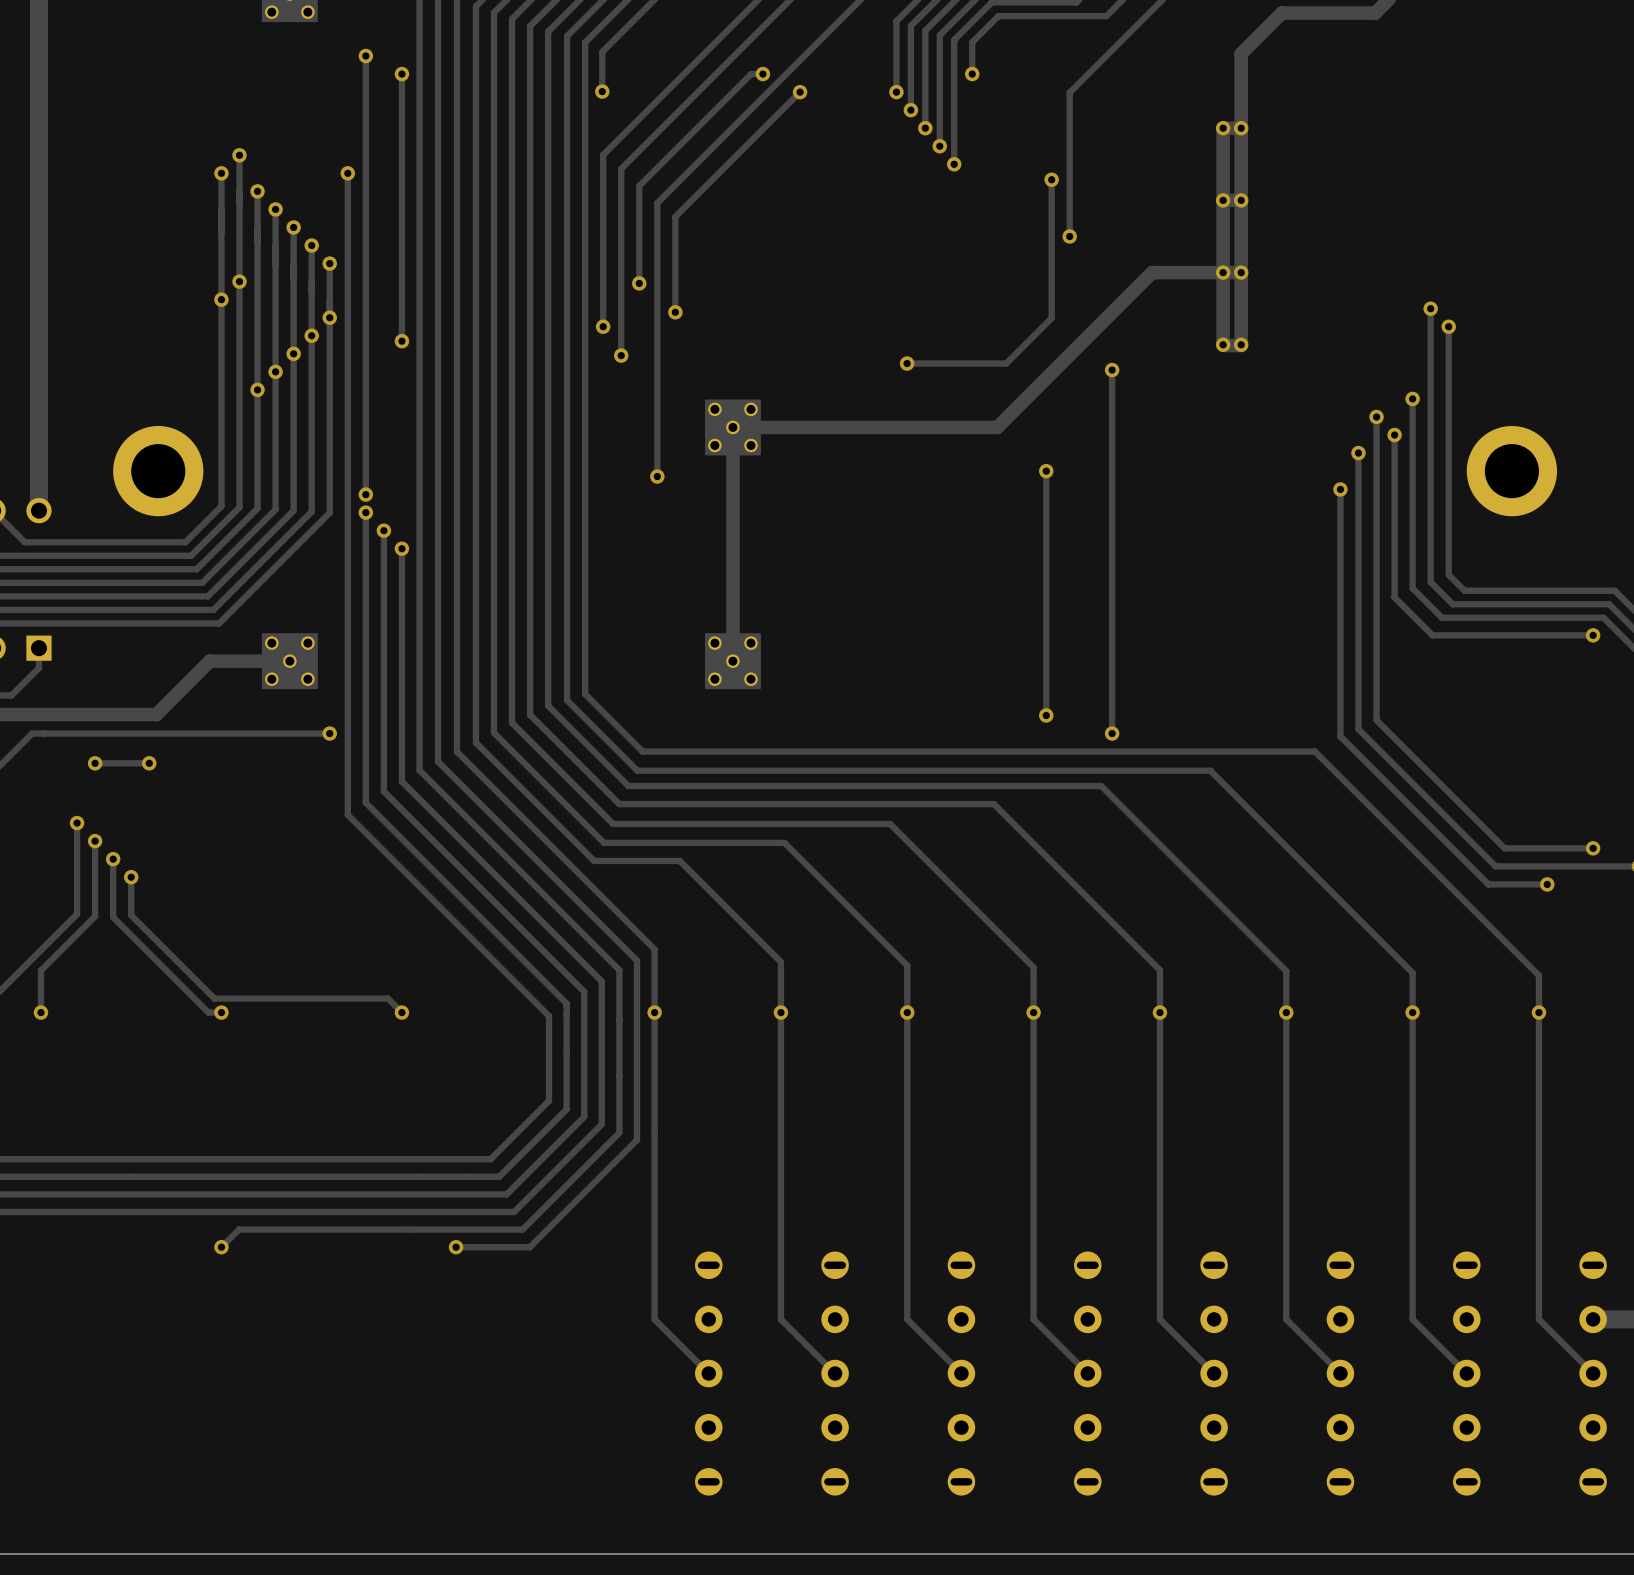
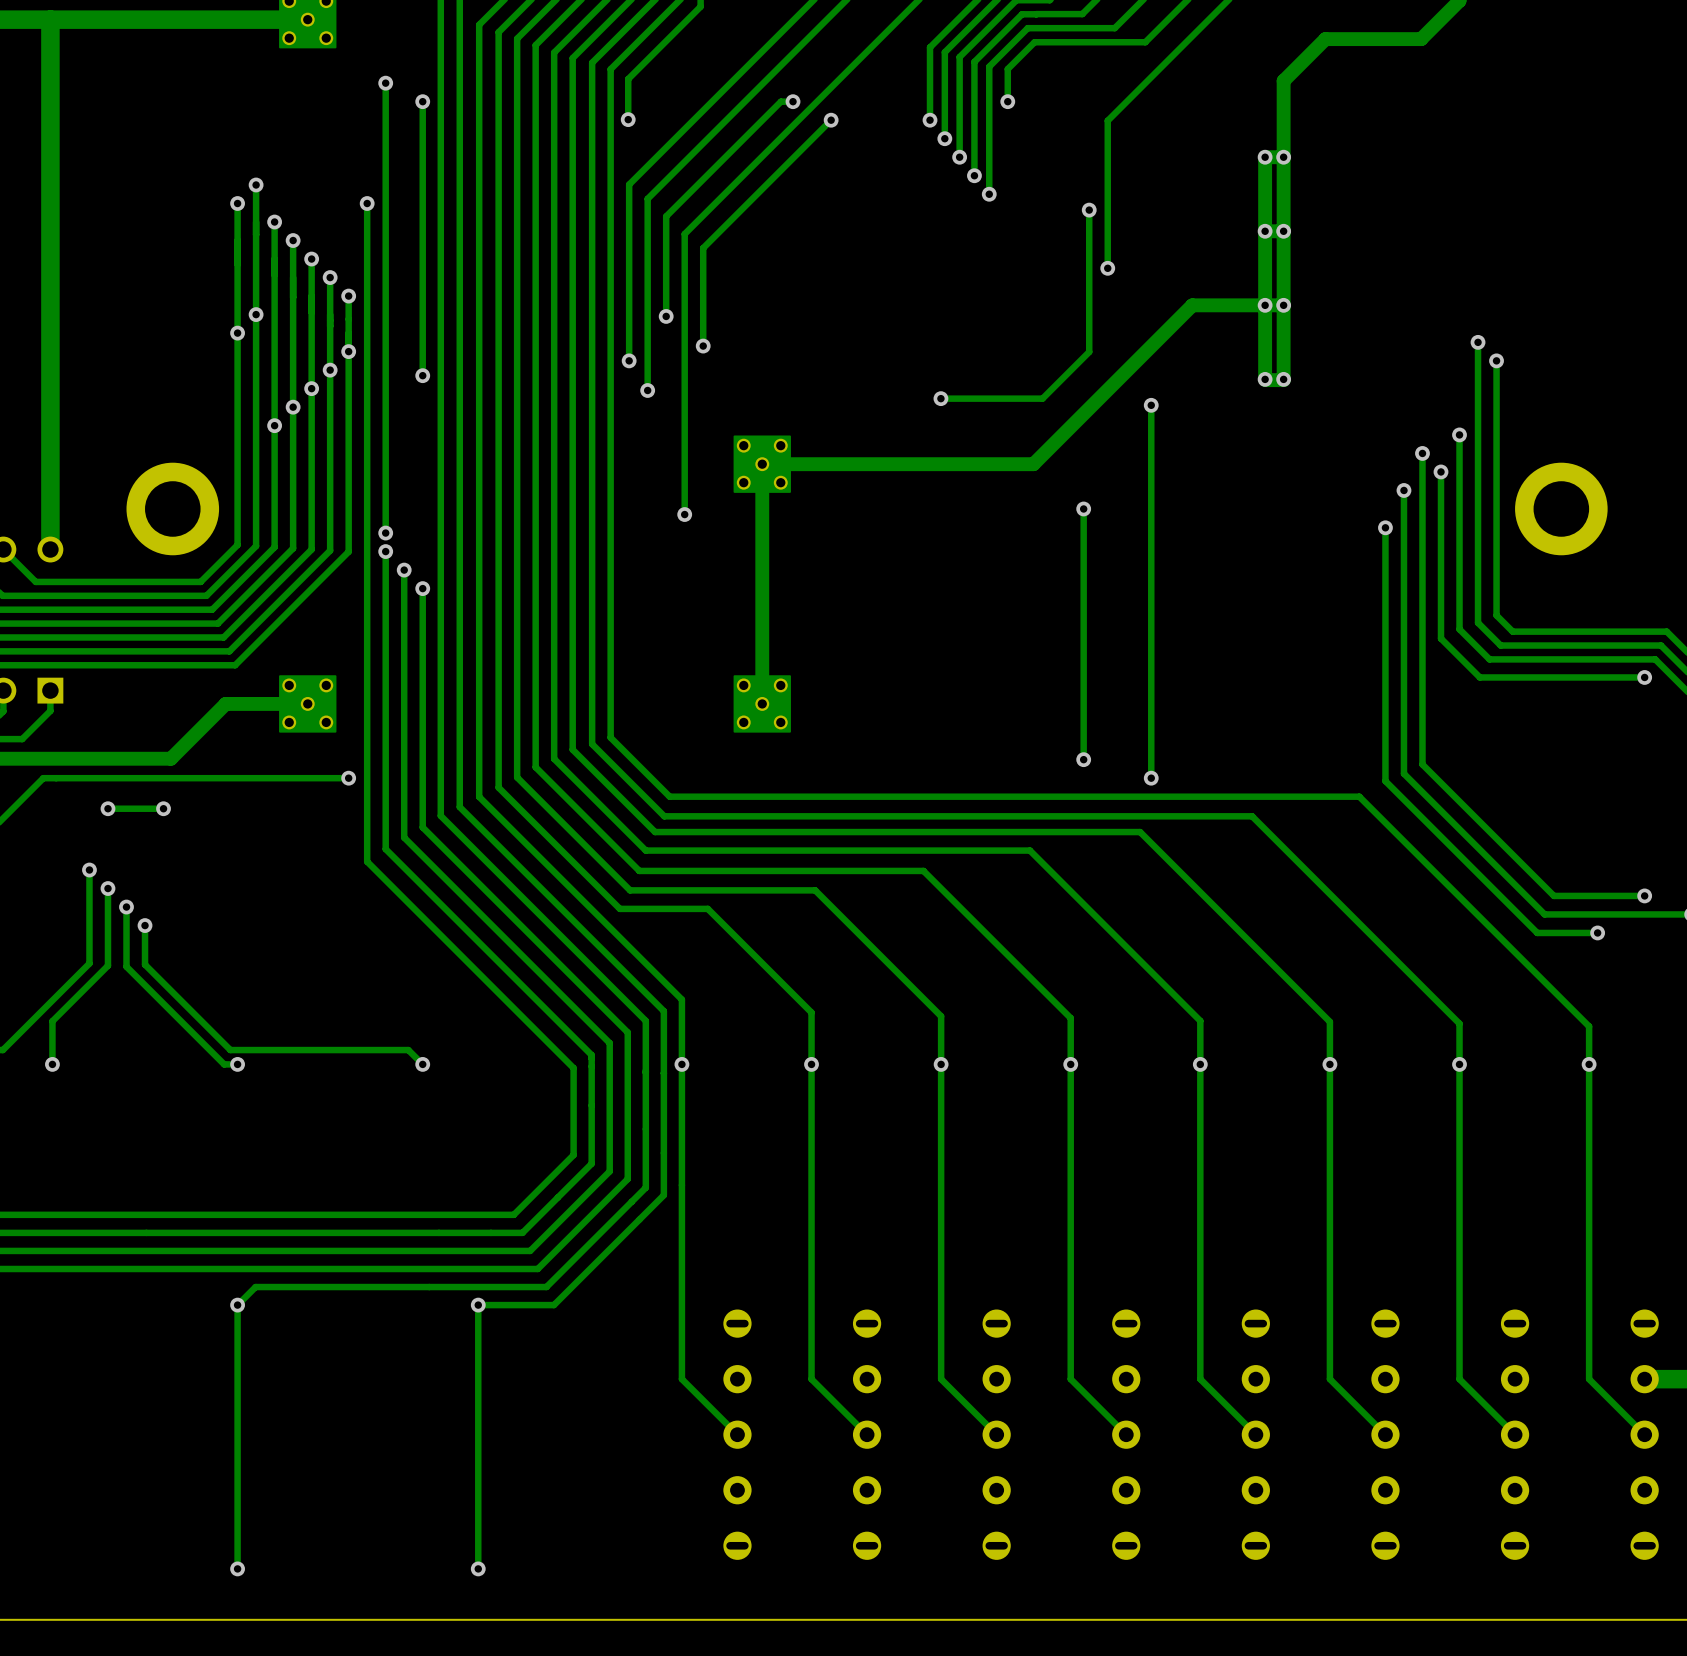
track: none -> (237, 1305) (237, 1568)
track: none -> (478, 1305) (478, 1568)
via: none -> (237, 1568)
via: none -> (478, 1568)

